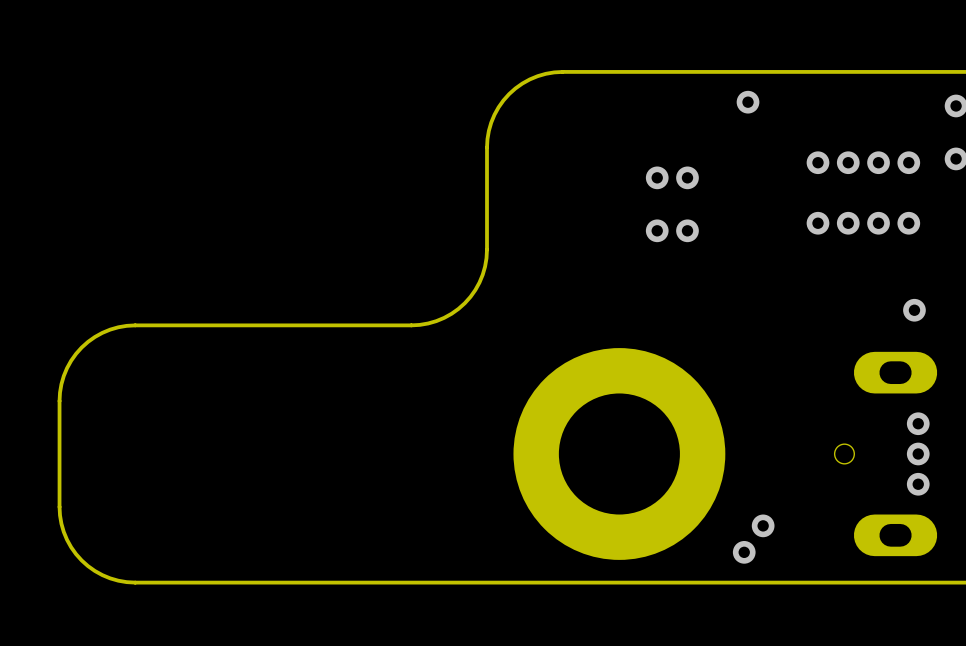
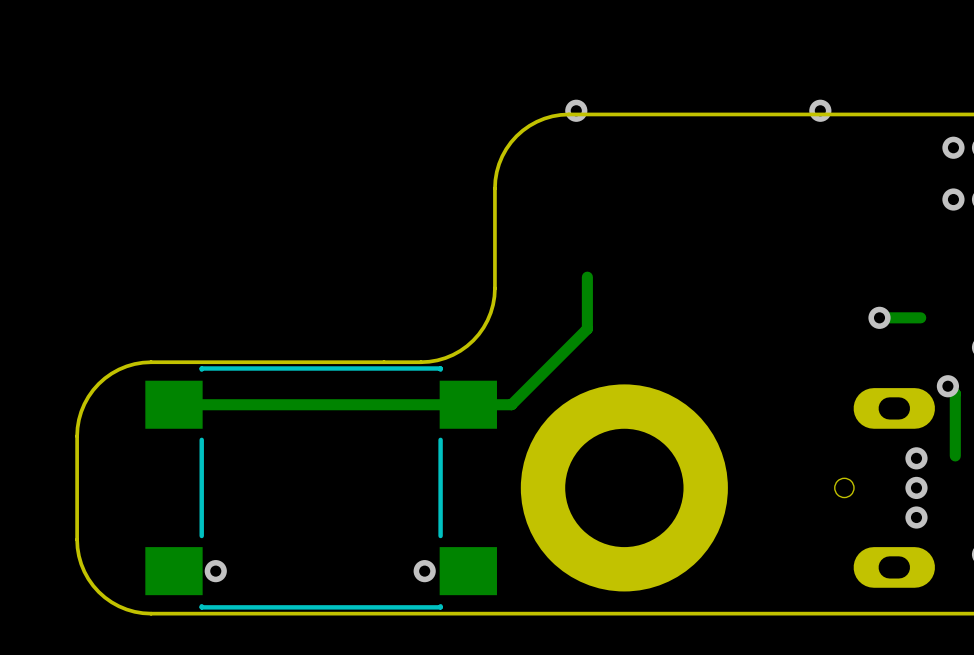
via: none -> (576, 110)
via: none -> (820, 110)
via: (748, 102) -> none
via: (818, 162) -> none
via: (848, 162) -> none
via: (878, 162) -> none
via: (908, 162) -> none
via: (657, 177) -> none
via: (687, 177) -> none
via: (818, 223) -> none
via: (848, 223) -> none
via: (878, 223) -> none
via: (908, 223) -> none
via: (657, 230) -> none
via: (687, 230) -> none
track: none -> (587, 277) (587, 328) (511, 404) (173, 404)
via: none -> (879, 317)
track: none -> (920, 317) (879, 317)
via: (914, 310) -> none
track: none -> (947, 386) (955, 393) (955, 455)
via: none -> (947, 386)
part: none -> (321, 487)
via: (763, 525) -> none
via: none -> (215, 571)
via: none -> (424, 571)
via: (744, 552) -> none

